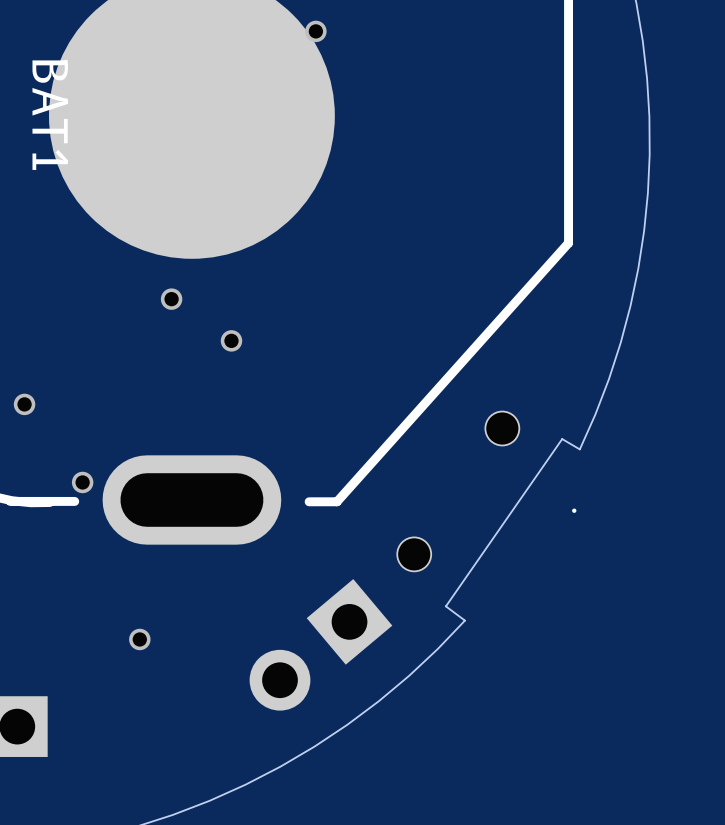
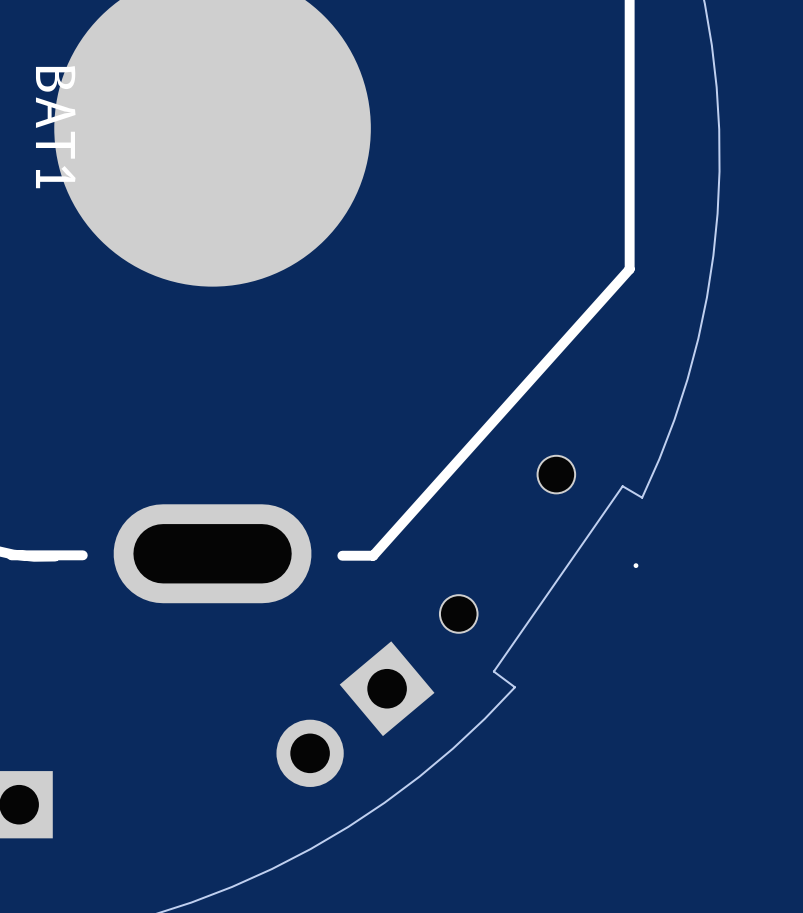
via: (315, 31) -> none
via: (171, 299) -> none
via: (231, 340) -> none
via: (24, 404) -> none
via: (82, 482) -> none
via: (139, 639) -> none

